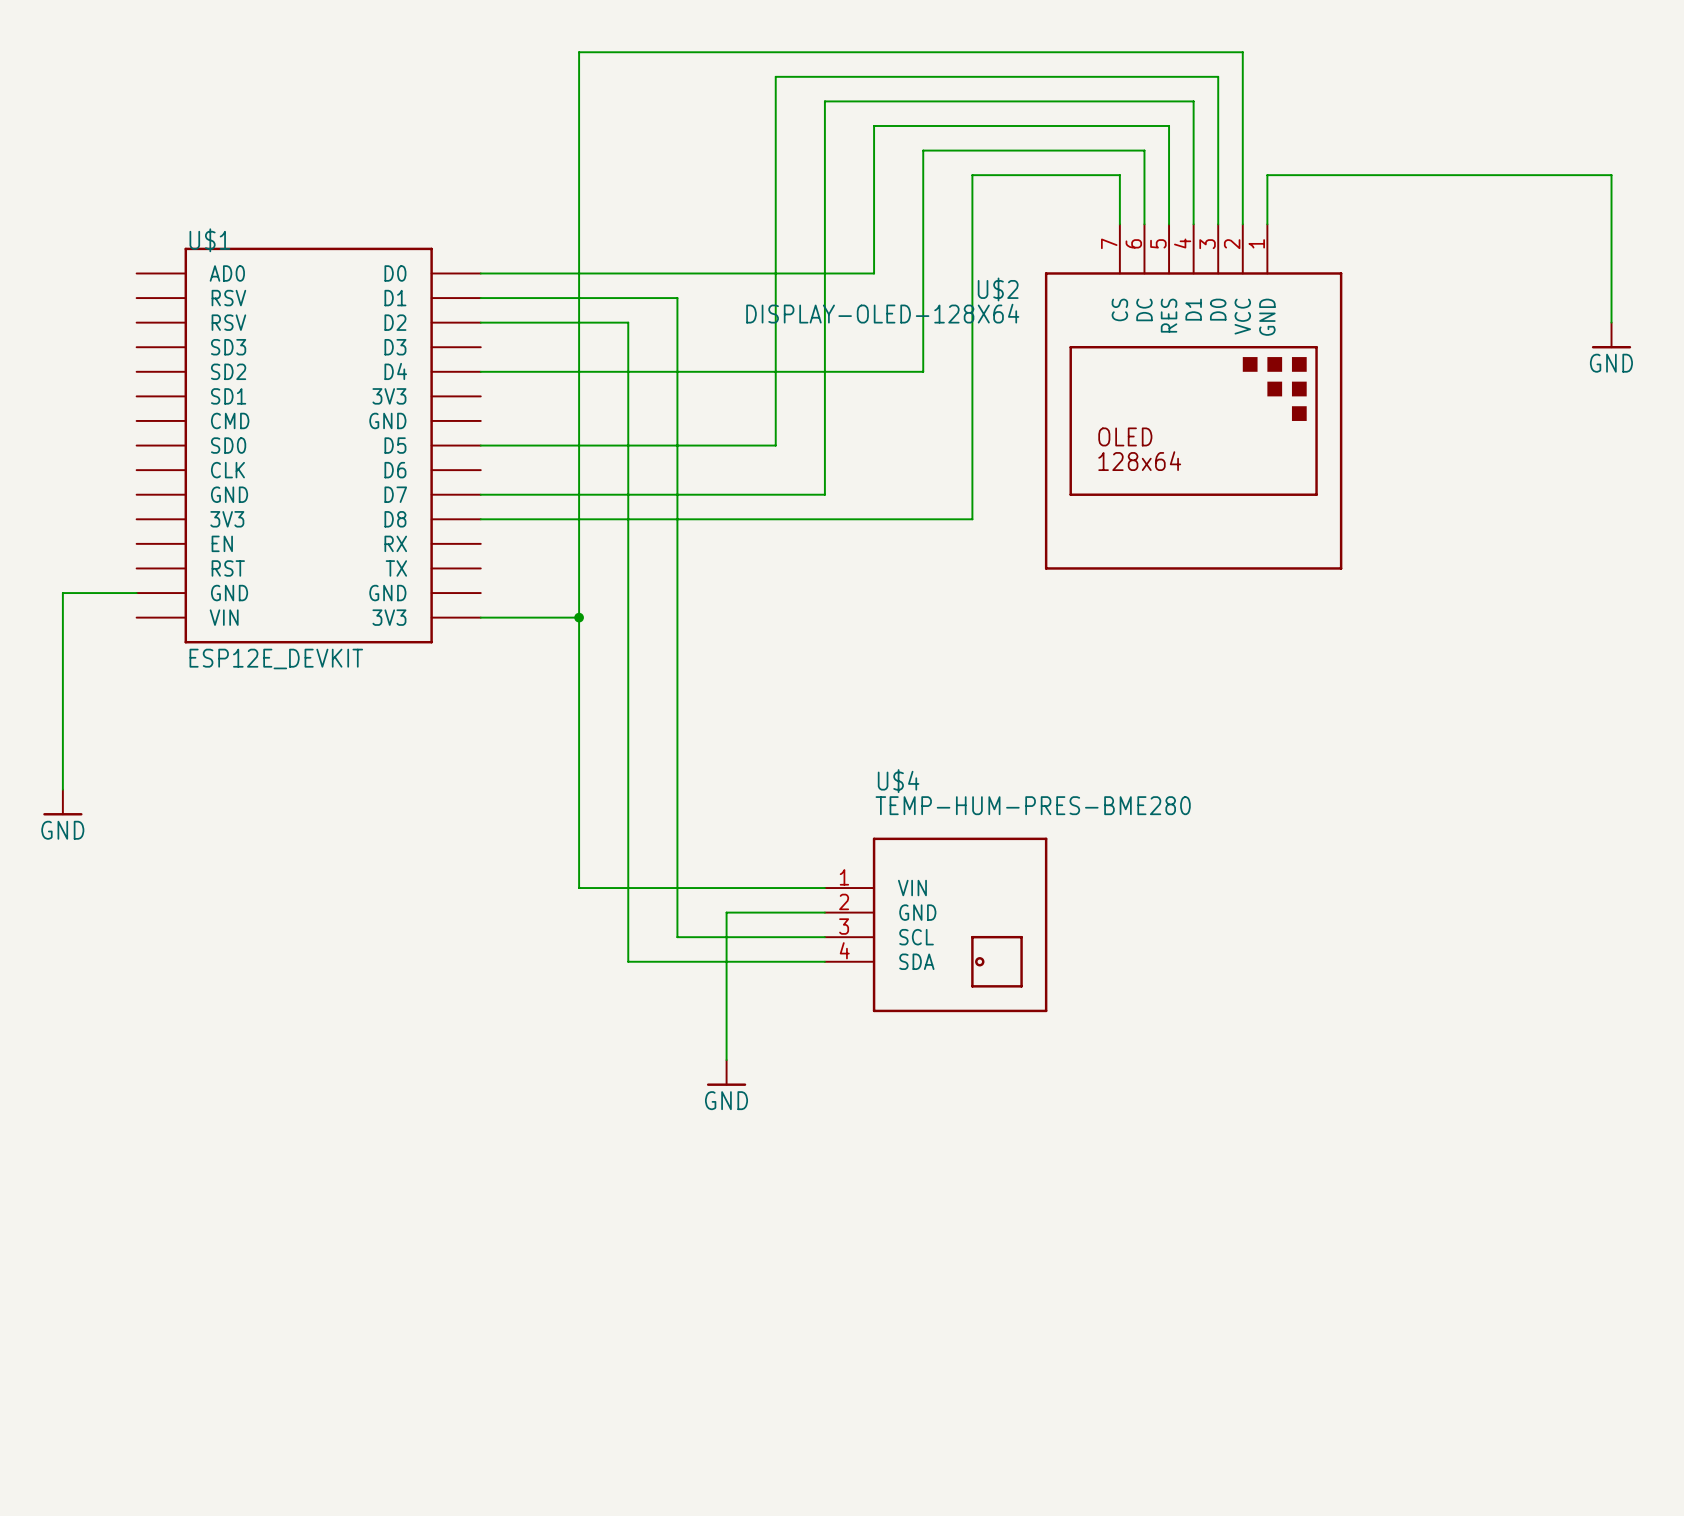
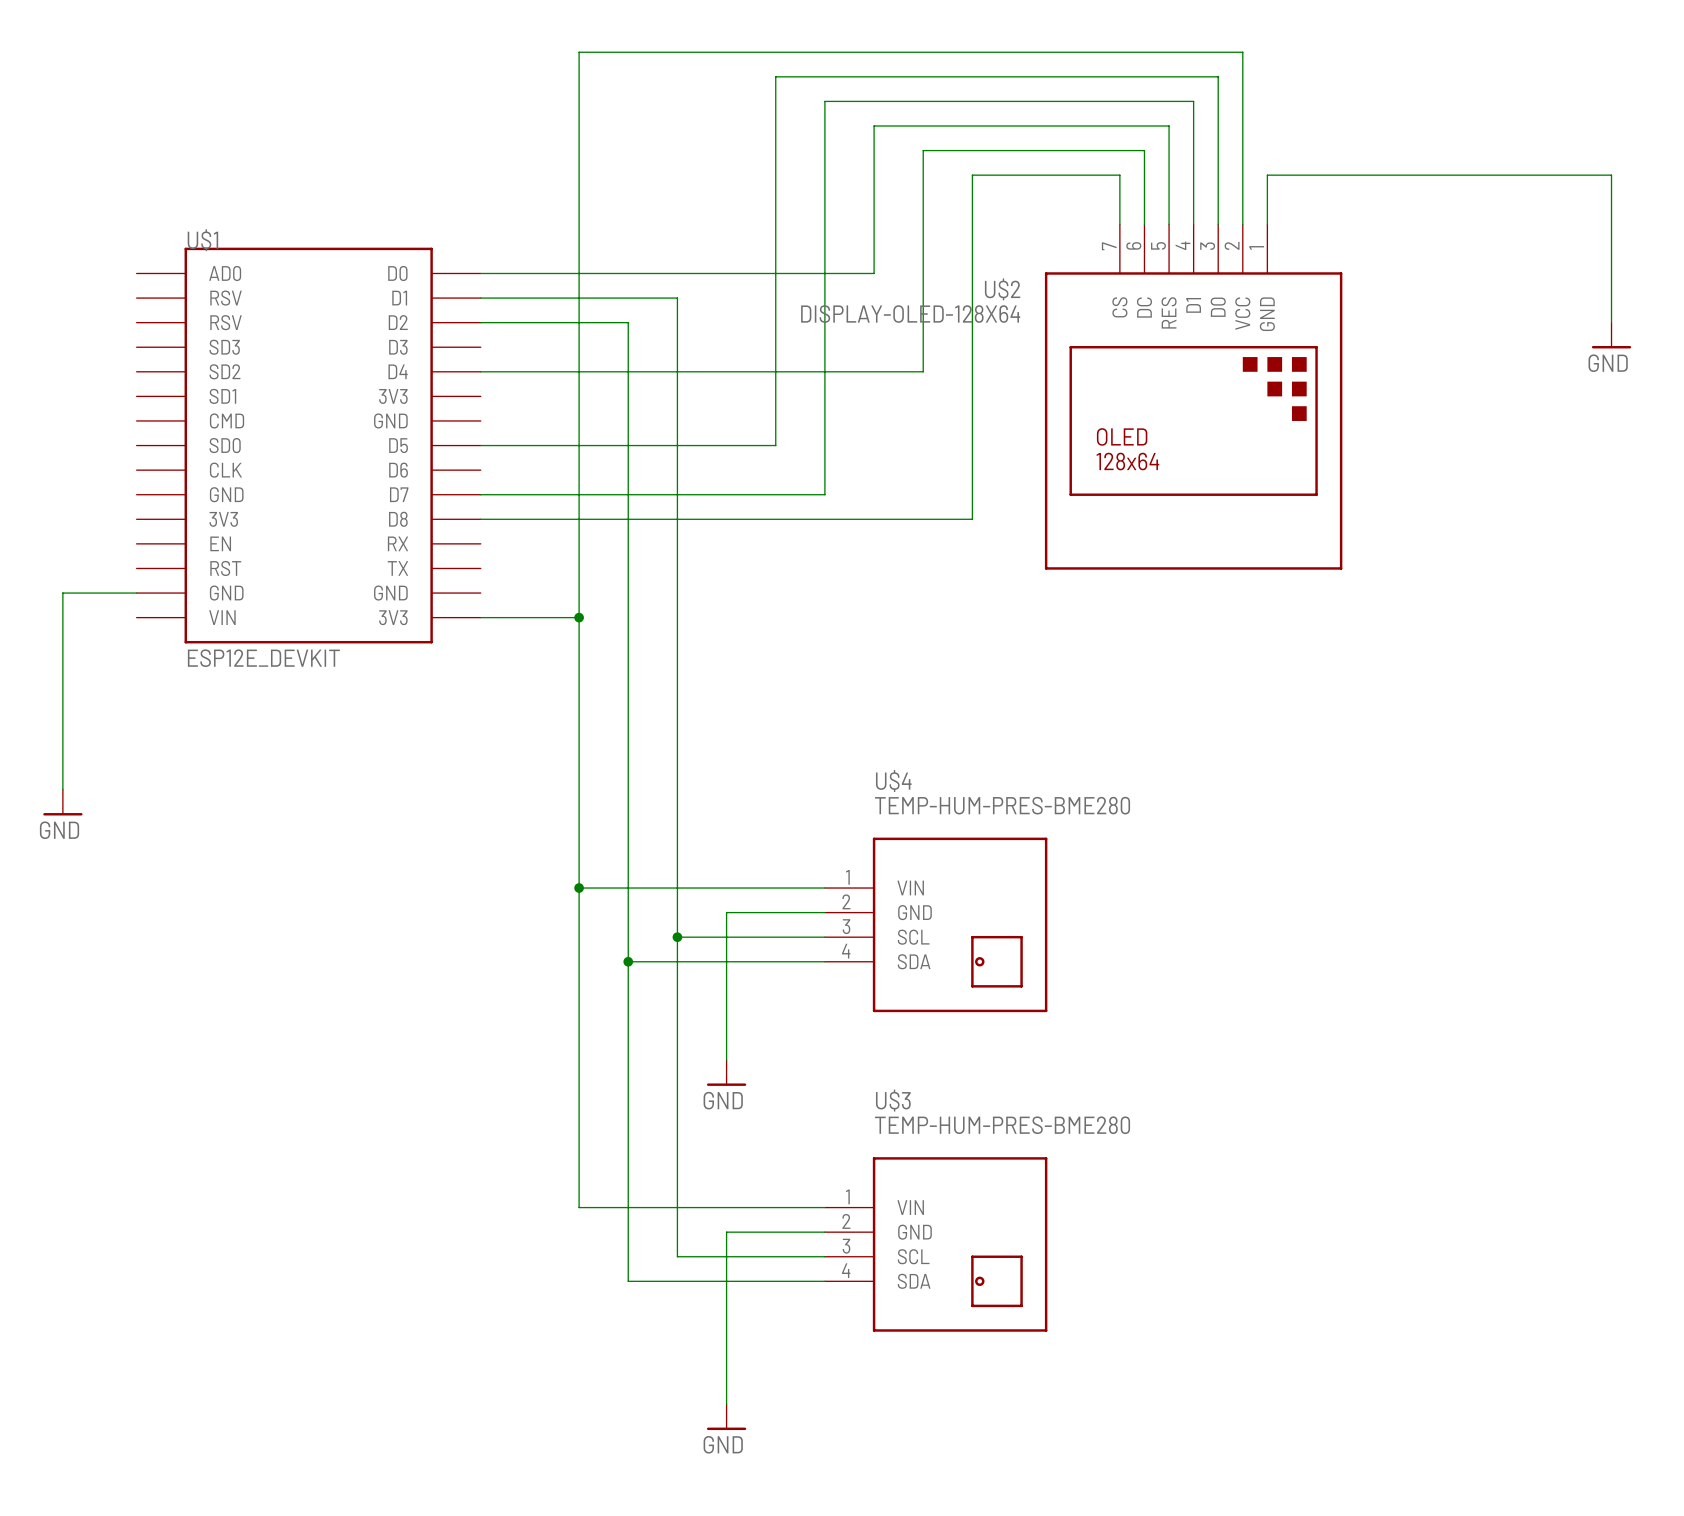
wire: none -> (579, 888) (579, 1207) (824, 1207)
junction: none -> (579, 888)
wire: none -> (677, 937) (677, 1256) (824, 1256)
junction: none -> (677, 937)
wire: none -> (628, 961) (628, 1281) (824, 1281)
junction: none -> (628, 961)
wire: none -> (824, 1232) (726, 1232) (726, 1404)
U$3: none -> TEMP-HUM-PRES-BME280 (936, 1244)
power symbol: none -> GND (726, 1417)

